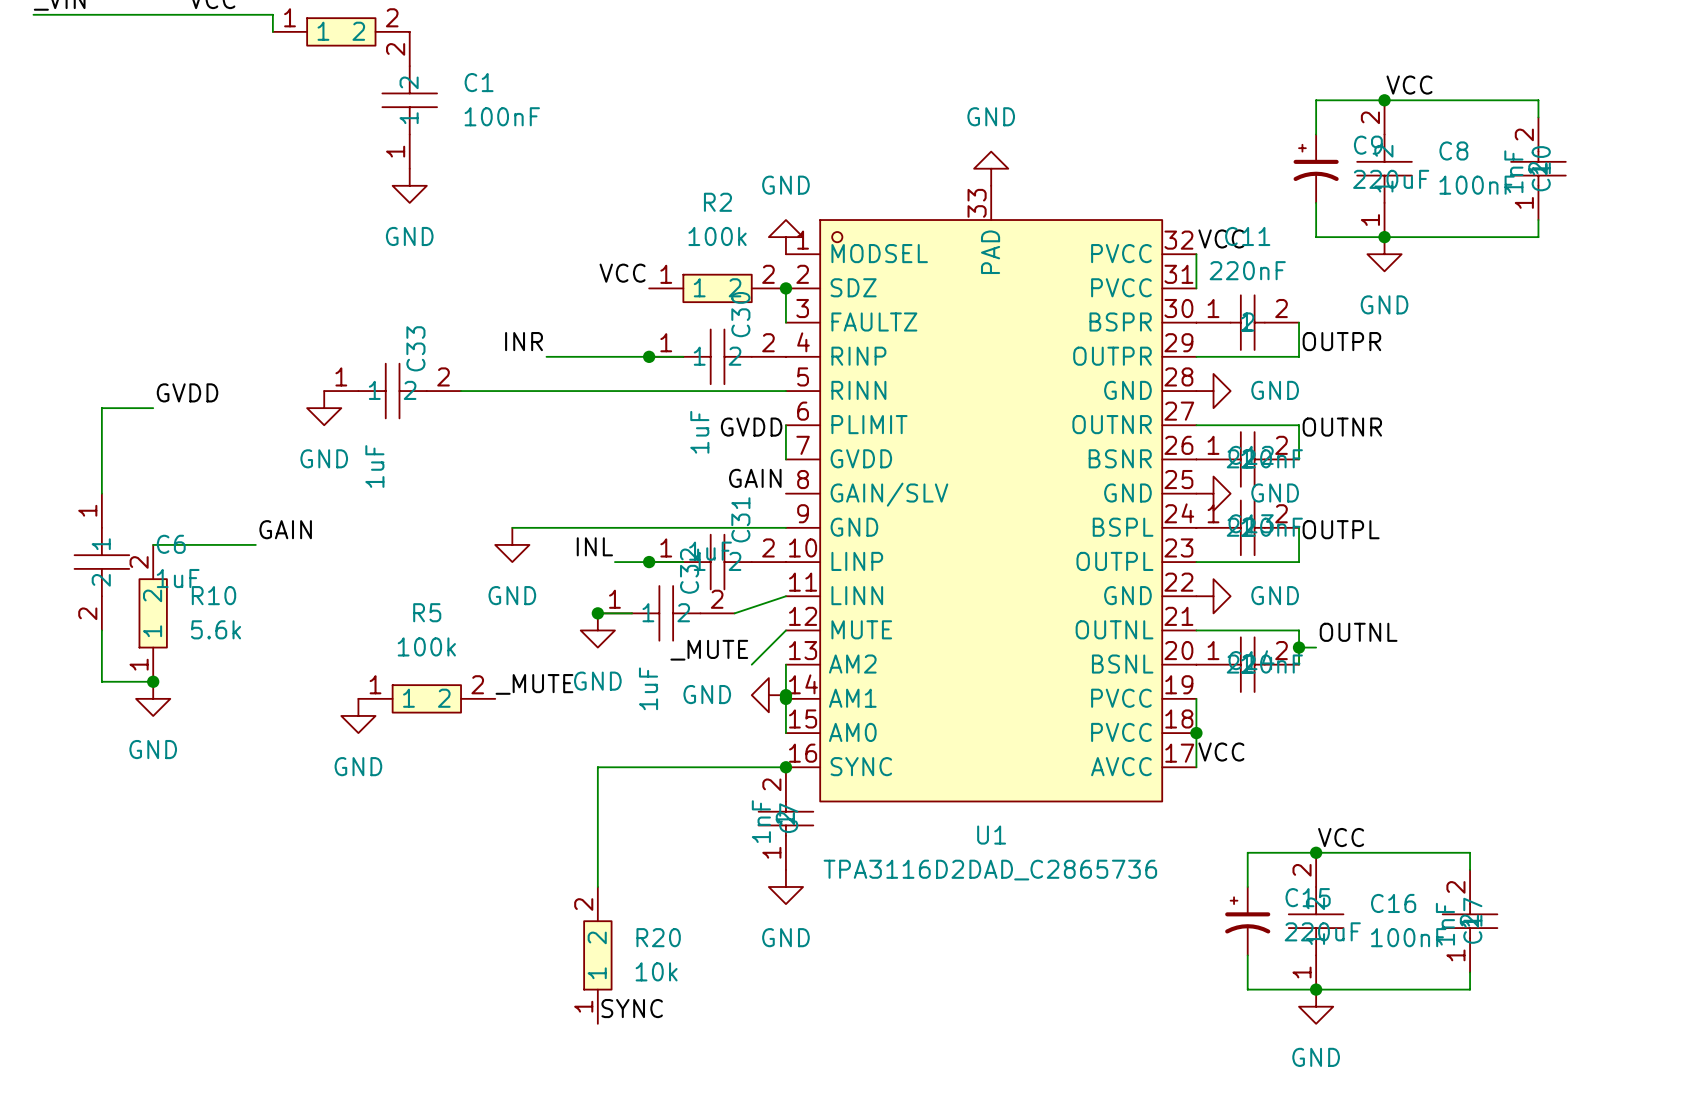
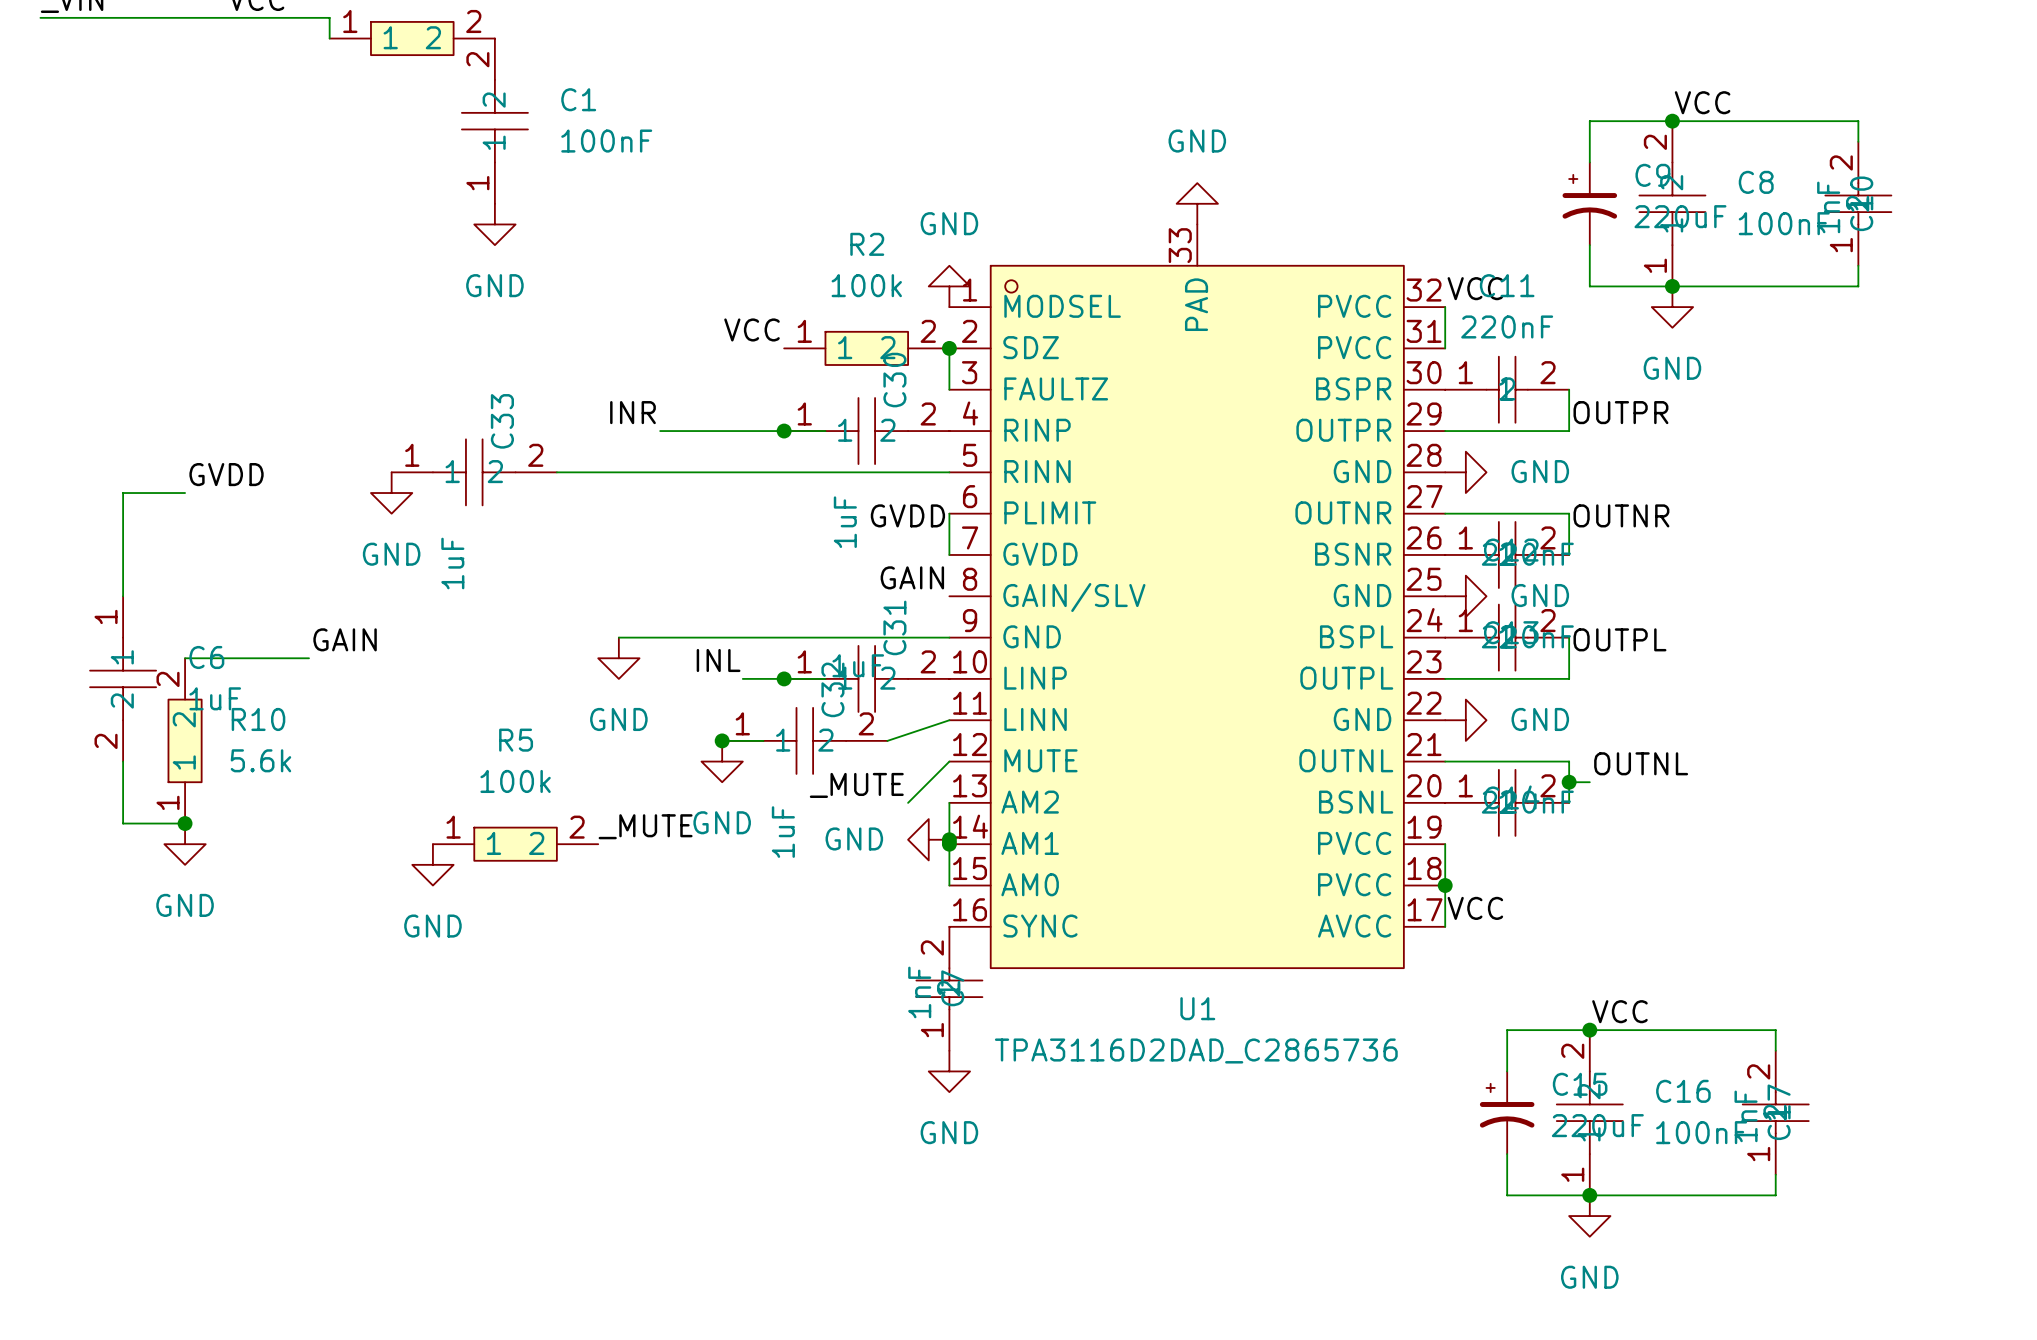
wire: (785, 767) (597, 767) (597, 886) -> none
junction: (785, 767) -> none
R20: 10k (597, 955) -> none
label: SYNC (632, 1008) -> none

